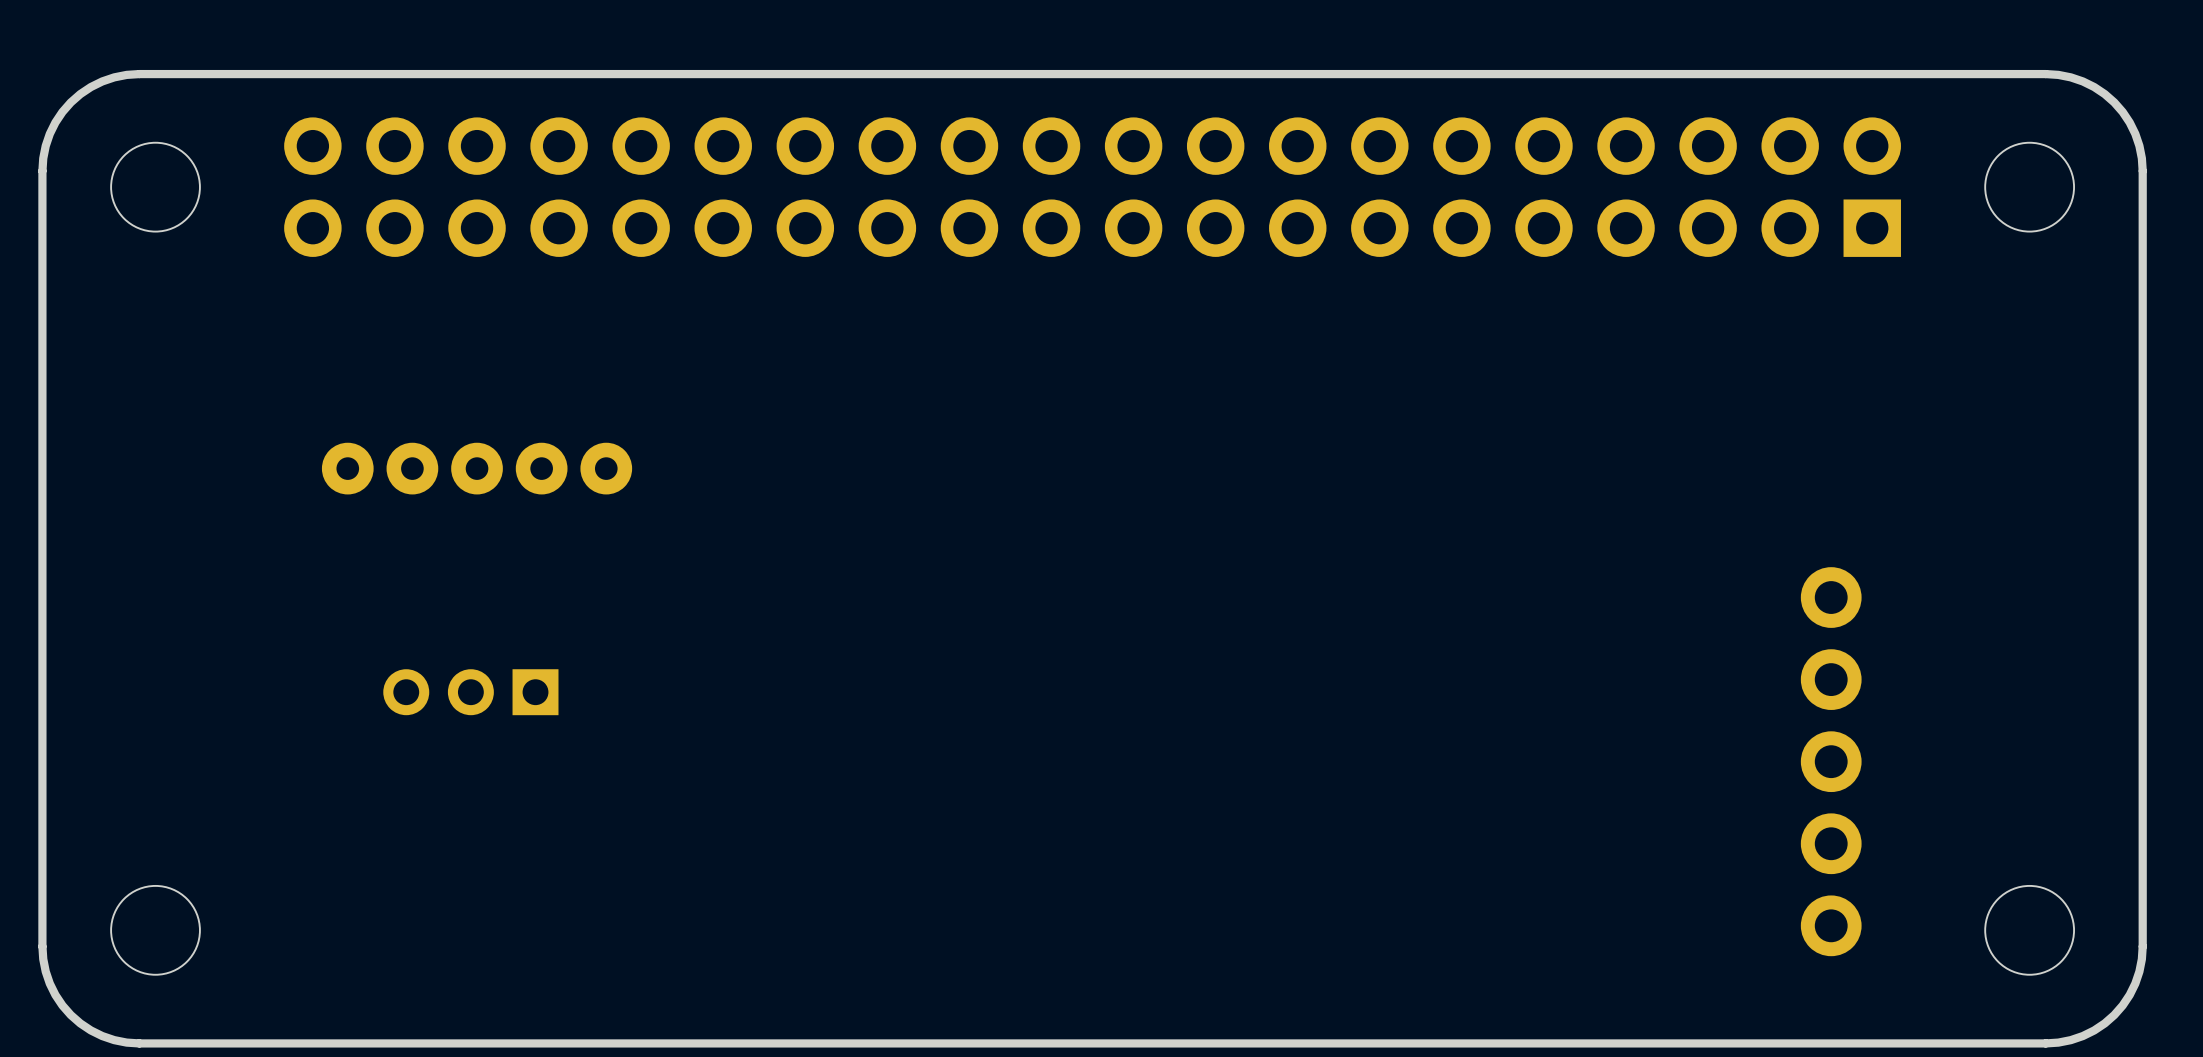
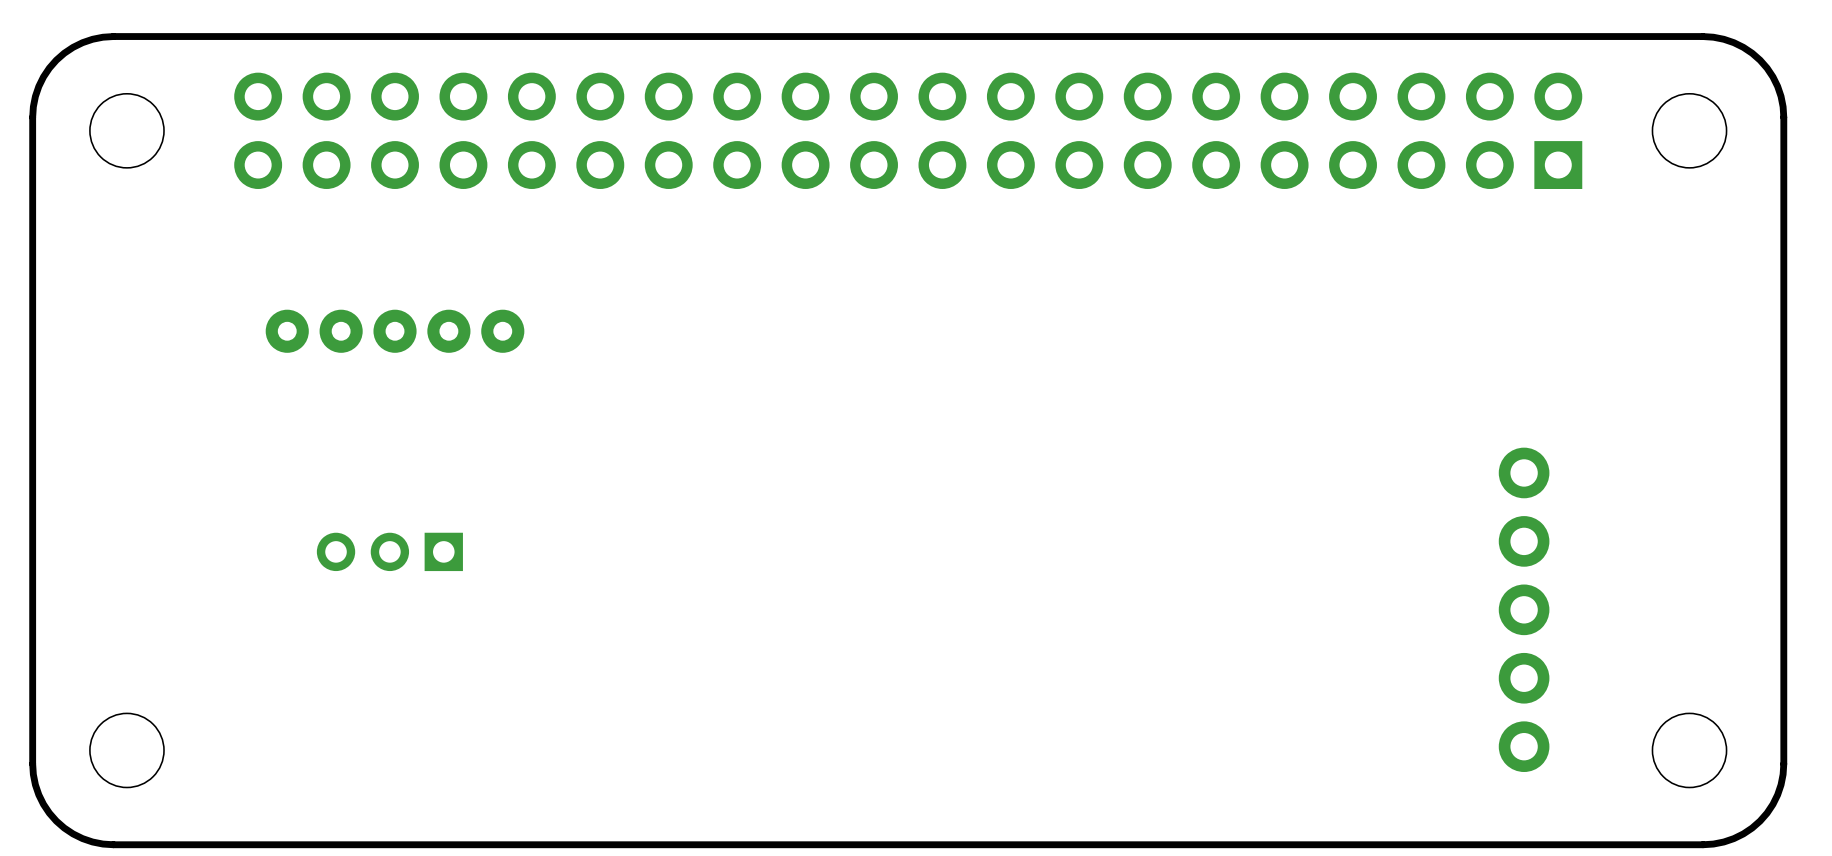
part position: (477, 468) -> (395, 331)

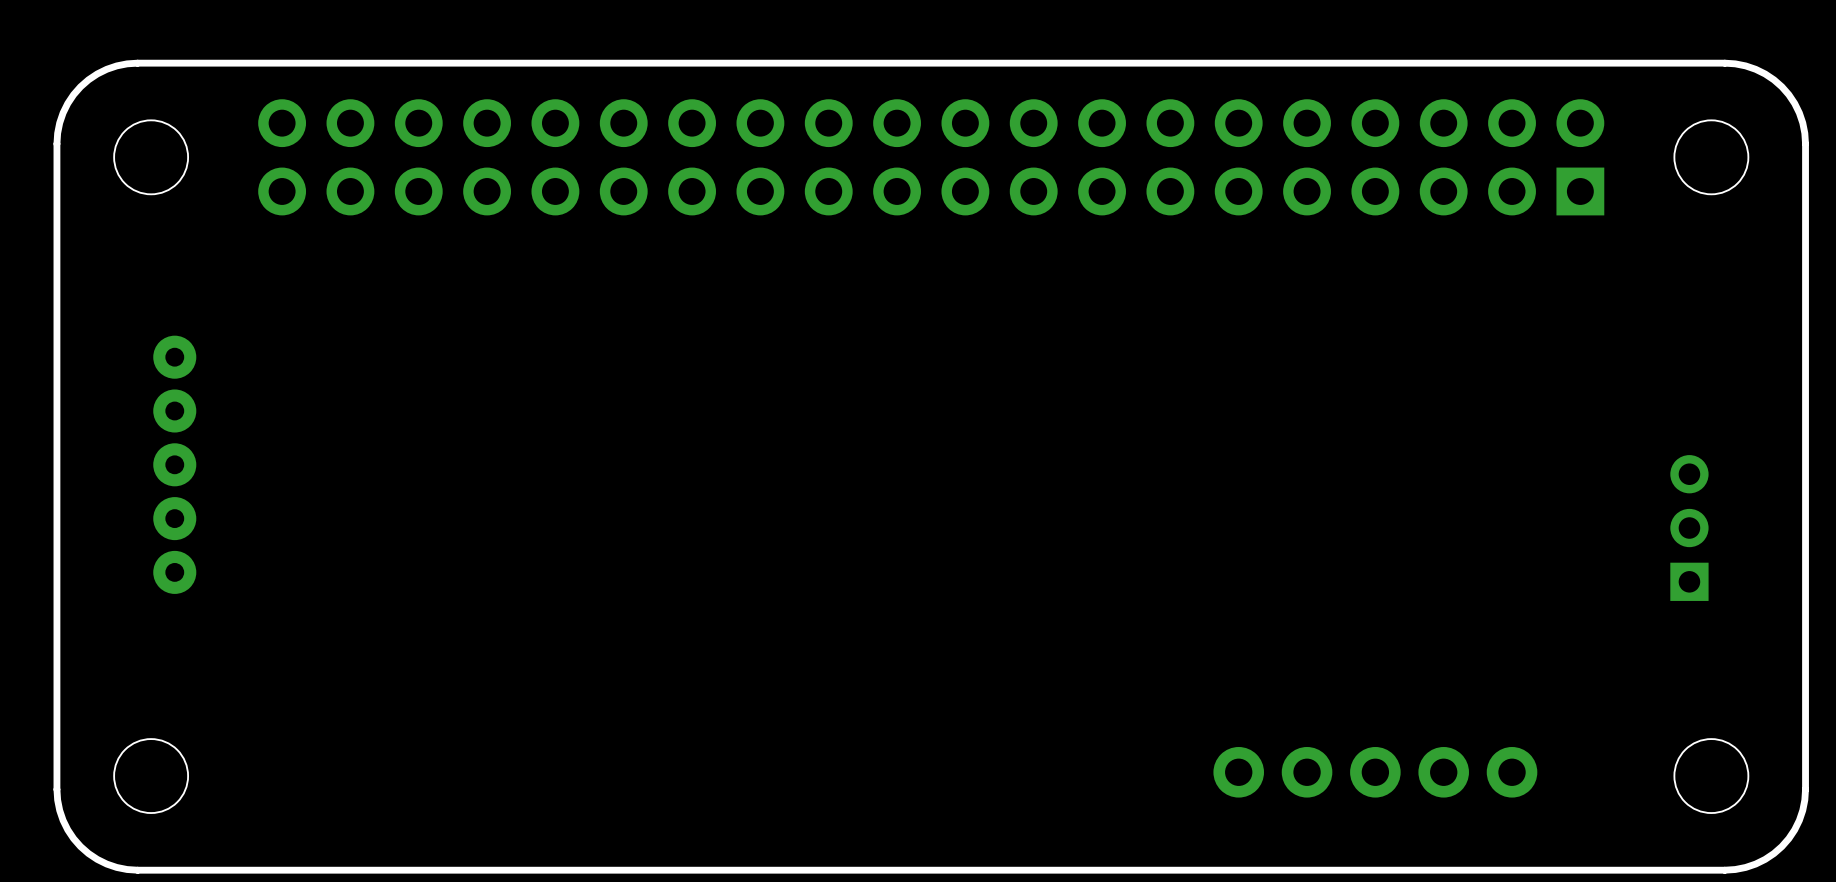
part rotation: 0° (395, 331) -> 90° clockwise (174, 464)
part position: (395, 331) -> (174, 464)
part: none -> (1689, 528)
part: (389, 551) -> none
part rotation: 0° (1524, 609) -> 90° clockwise (1375, 772)
part position: (1524, 609) -> (1375, 772)

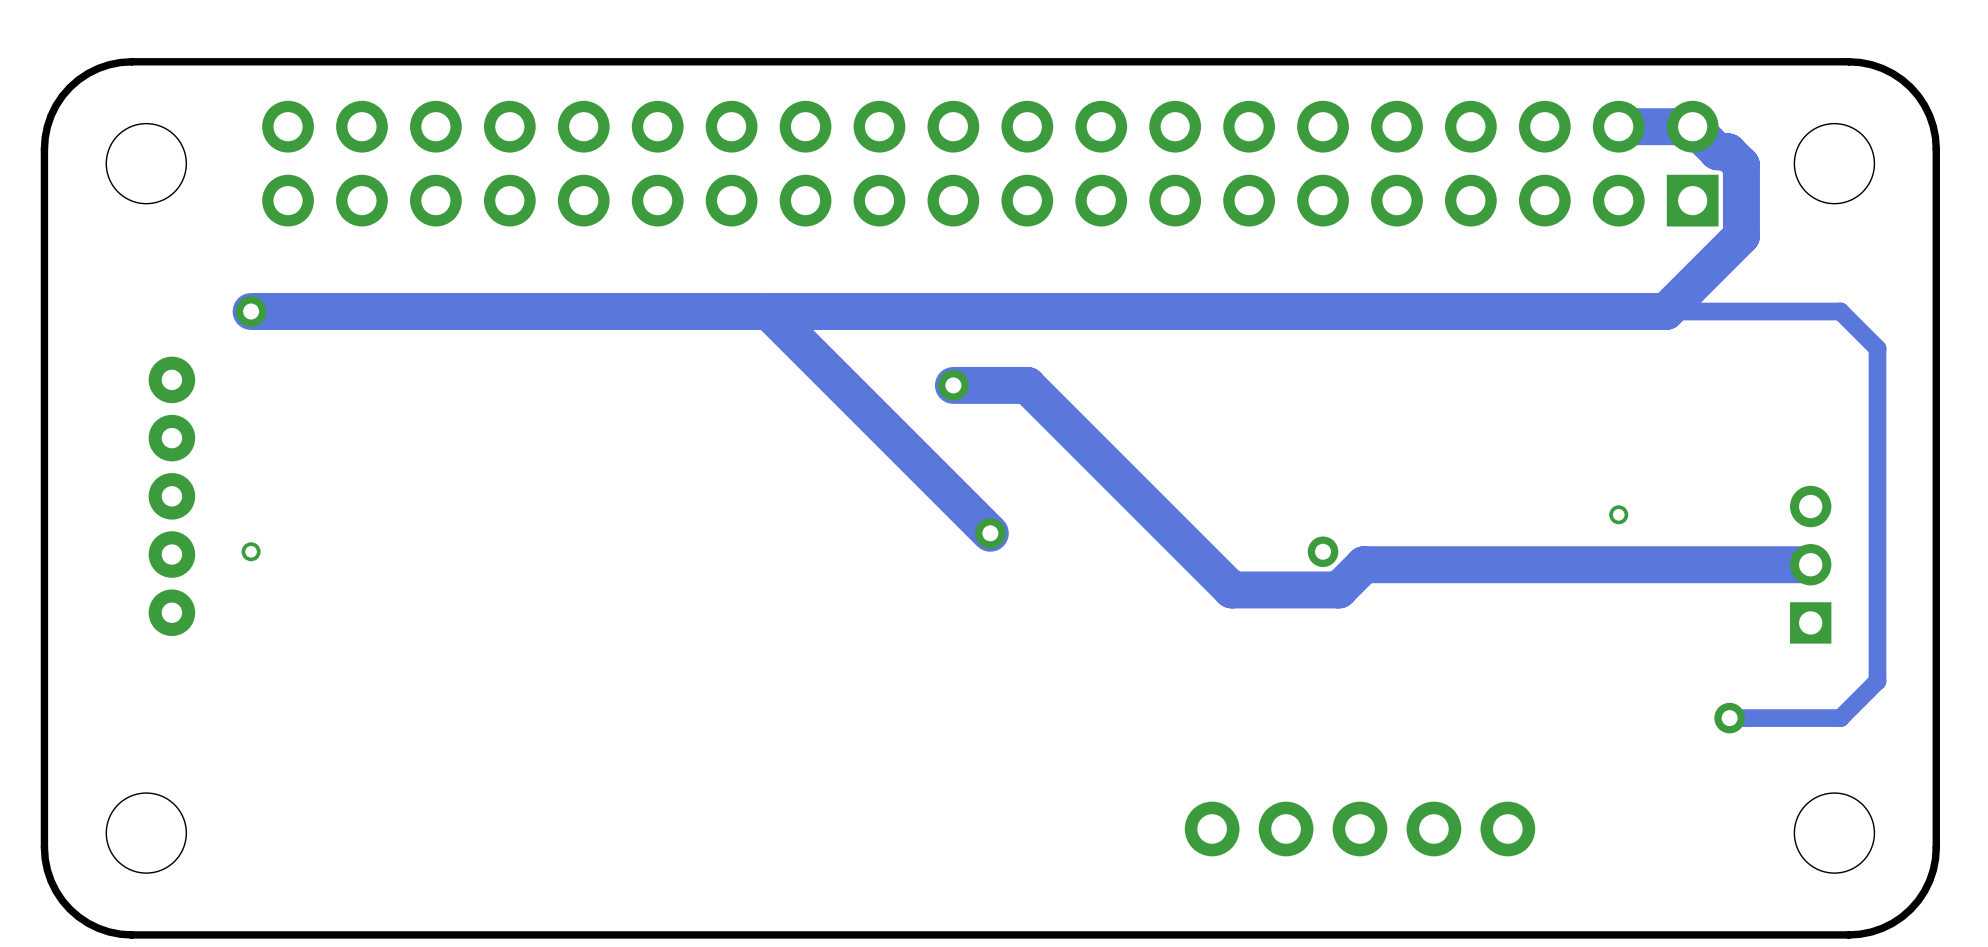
track: none -> (1618, 126) (1692, 126) (1717, 151) (1728, 151) (1741, 165) (1741, 235) (1665, 311)
via: none -> (251, 311)
track: none -> (768, 311) (990, 533)
track: none -> (1665, 311) (251, 311)
track: none -> (1665, 311) (1840, 311) (1877, 348) (1877, 681) (1840, 718) (1729, 718)
track: none -> (953, 385) (1027, 385) (1231, 589) (1338, 589) (1364, 564) (1810, 564)
via: none -> (953, 385)
via: none -> (1618, 514)
via: none -> (990, 533)
via: none -> (251, 551)
via: none -> (1323, 551)
via: none -> (1729, 718)
part position: (1375, 772) -> (1359, 829)

